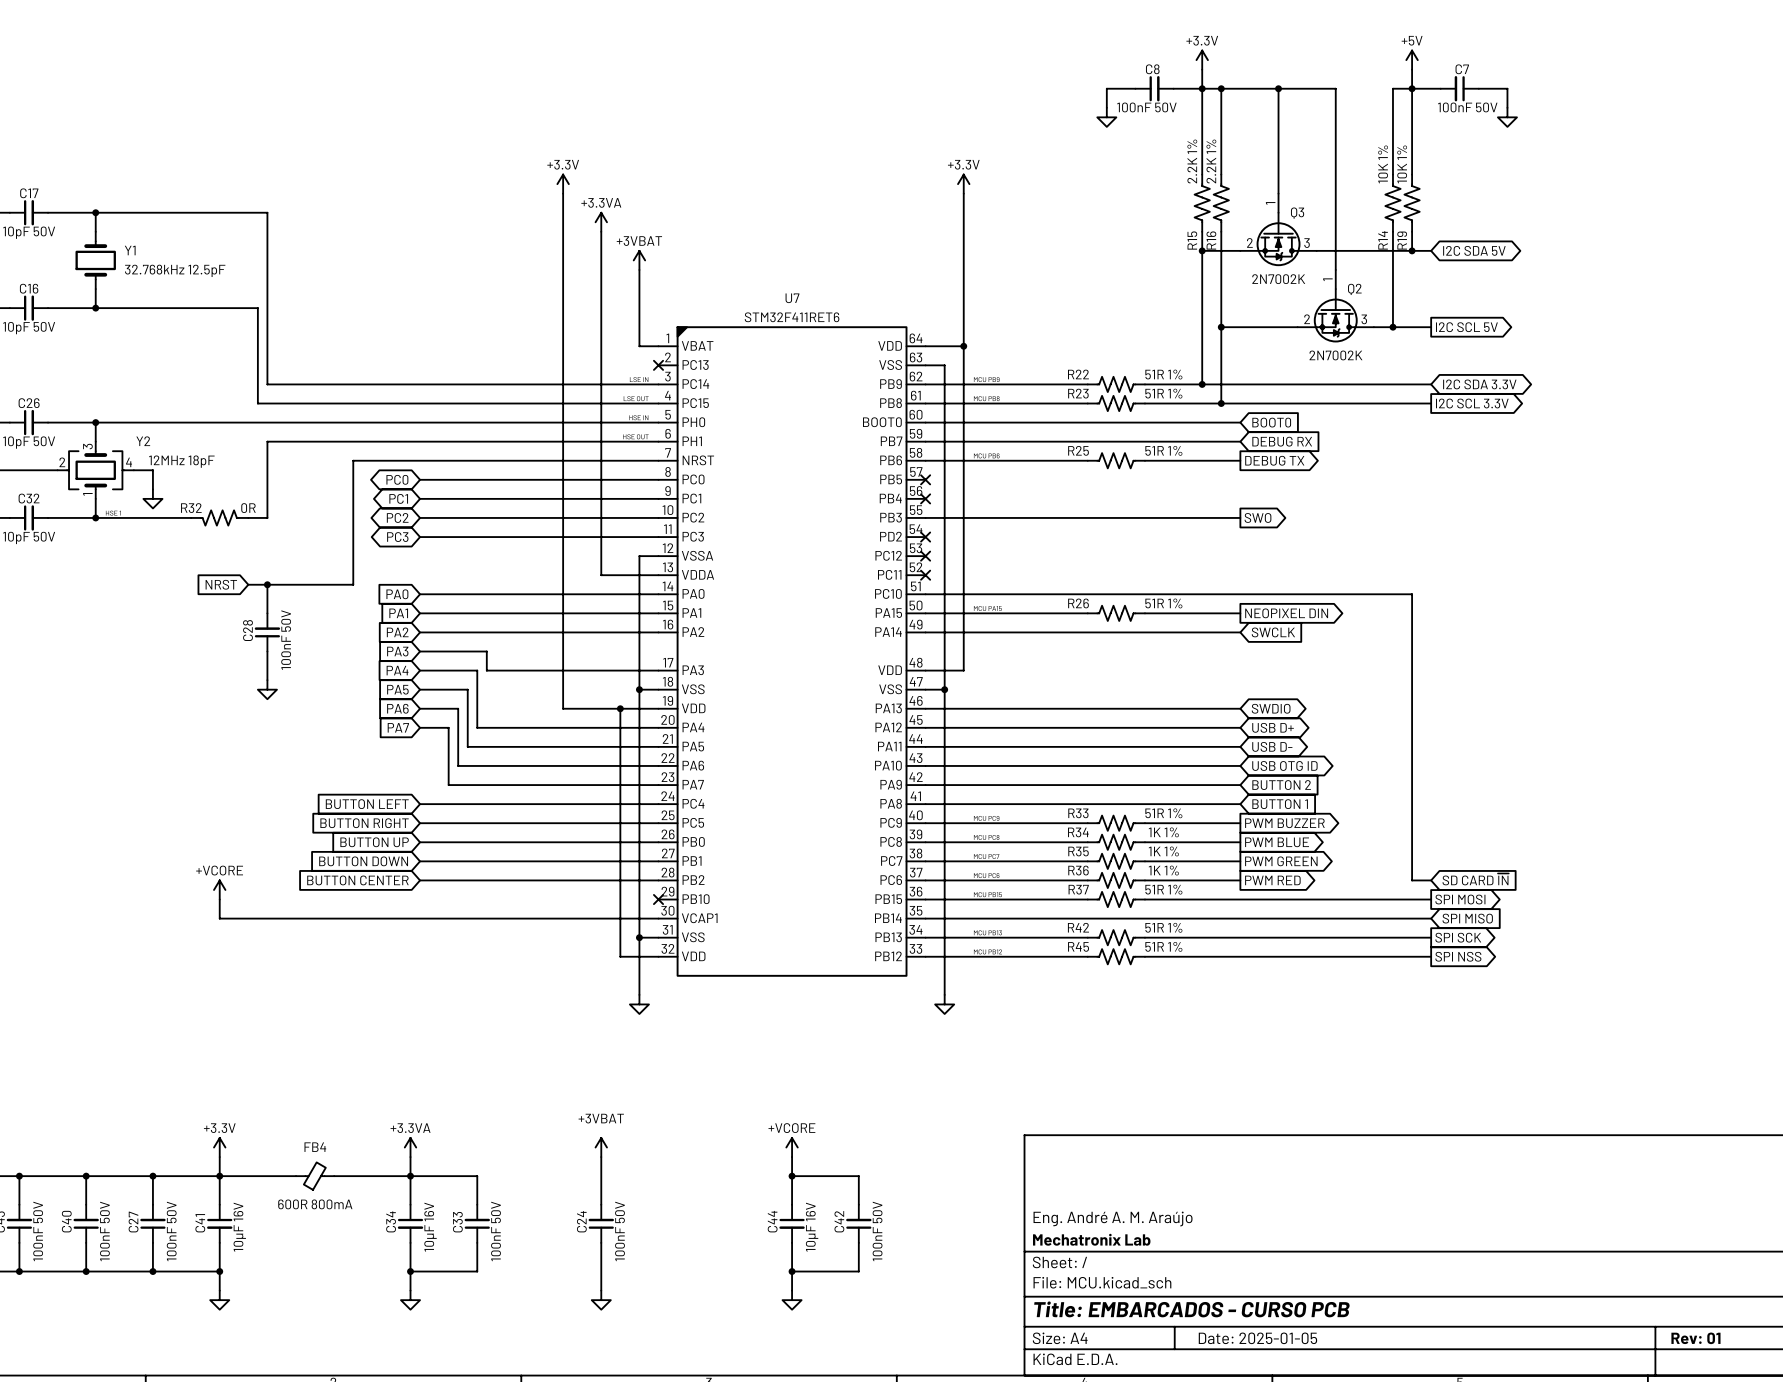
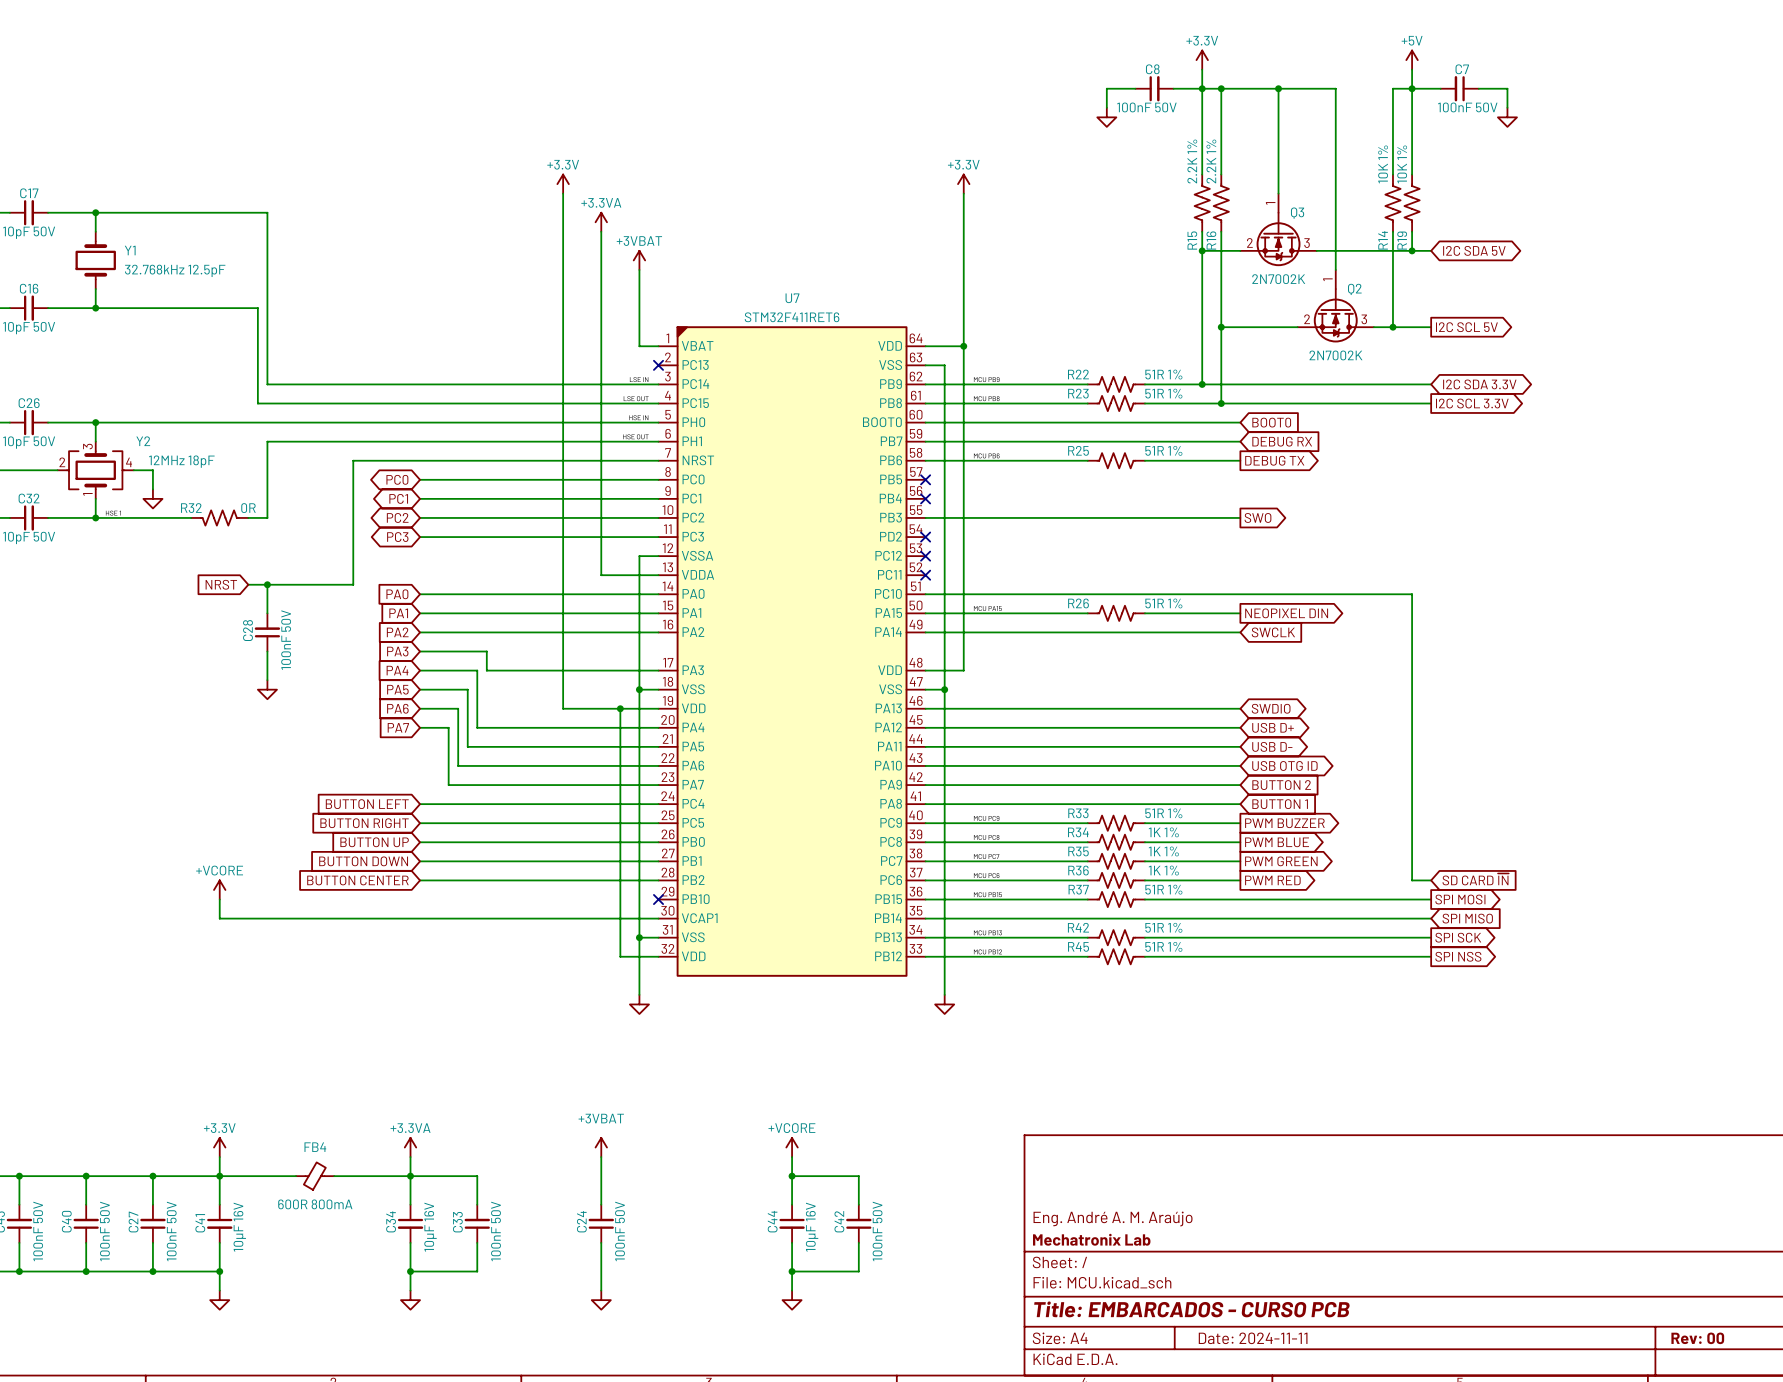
title block: Date: 2025-01-05 (1257, 1338) -> Date: 2024-11-11 (1253, 1338)
title block: Rev: 01 (1695, 1338) -> Rev: 00 (1697, 1338)

